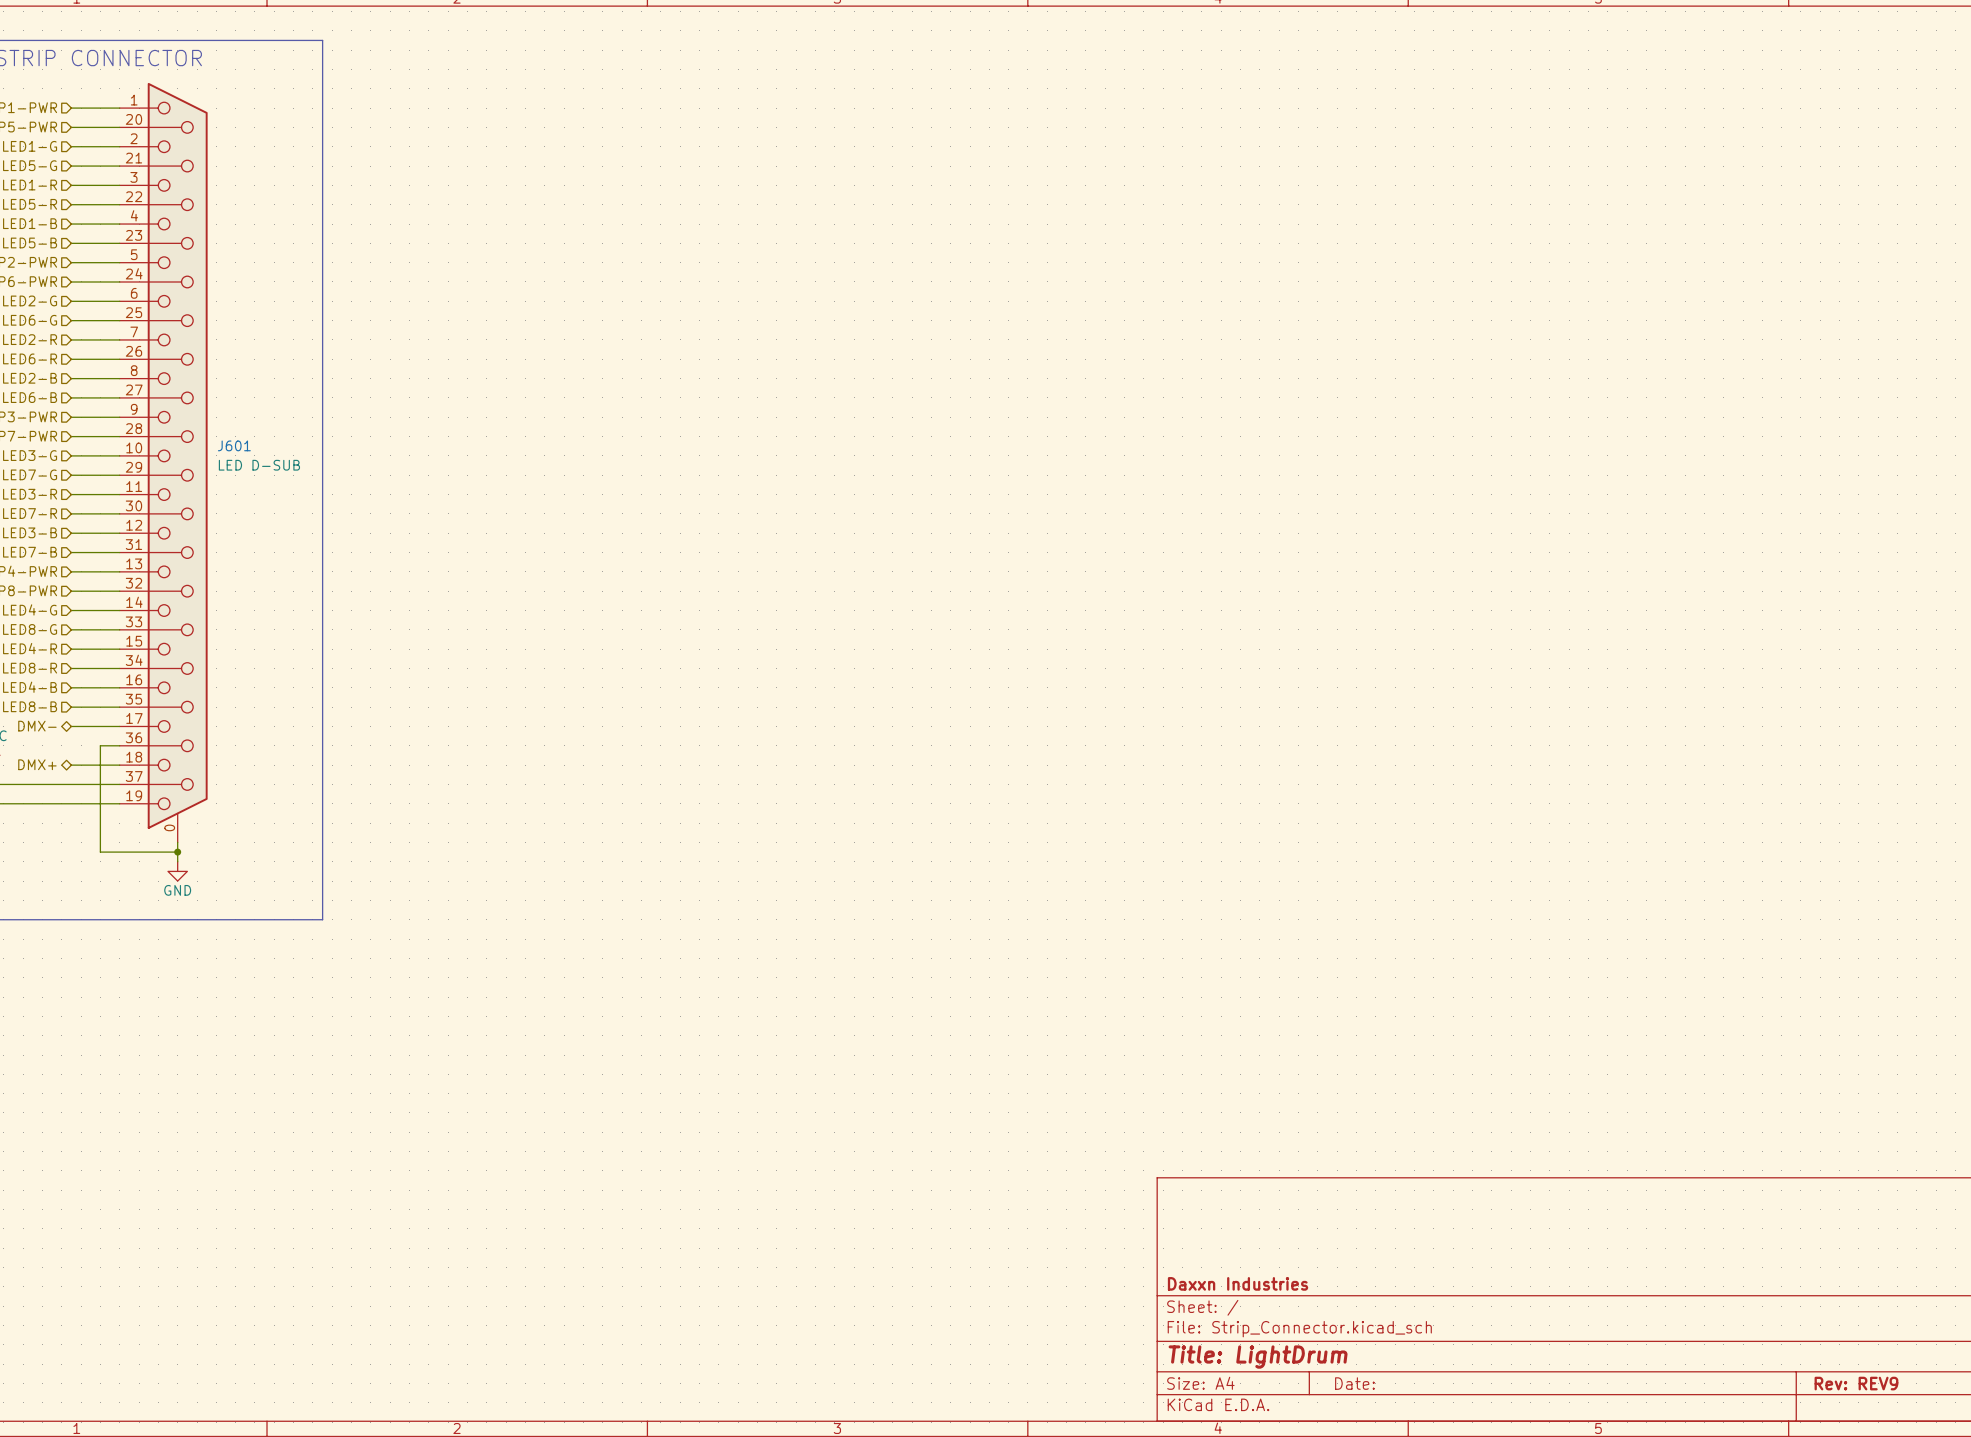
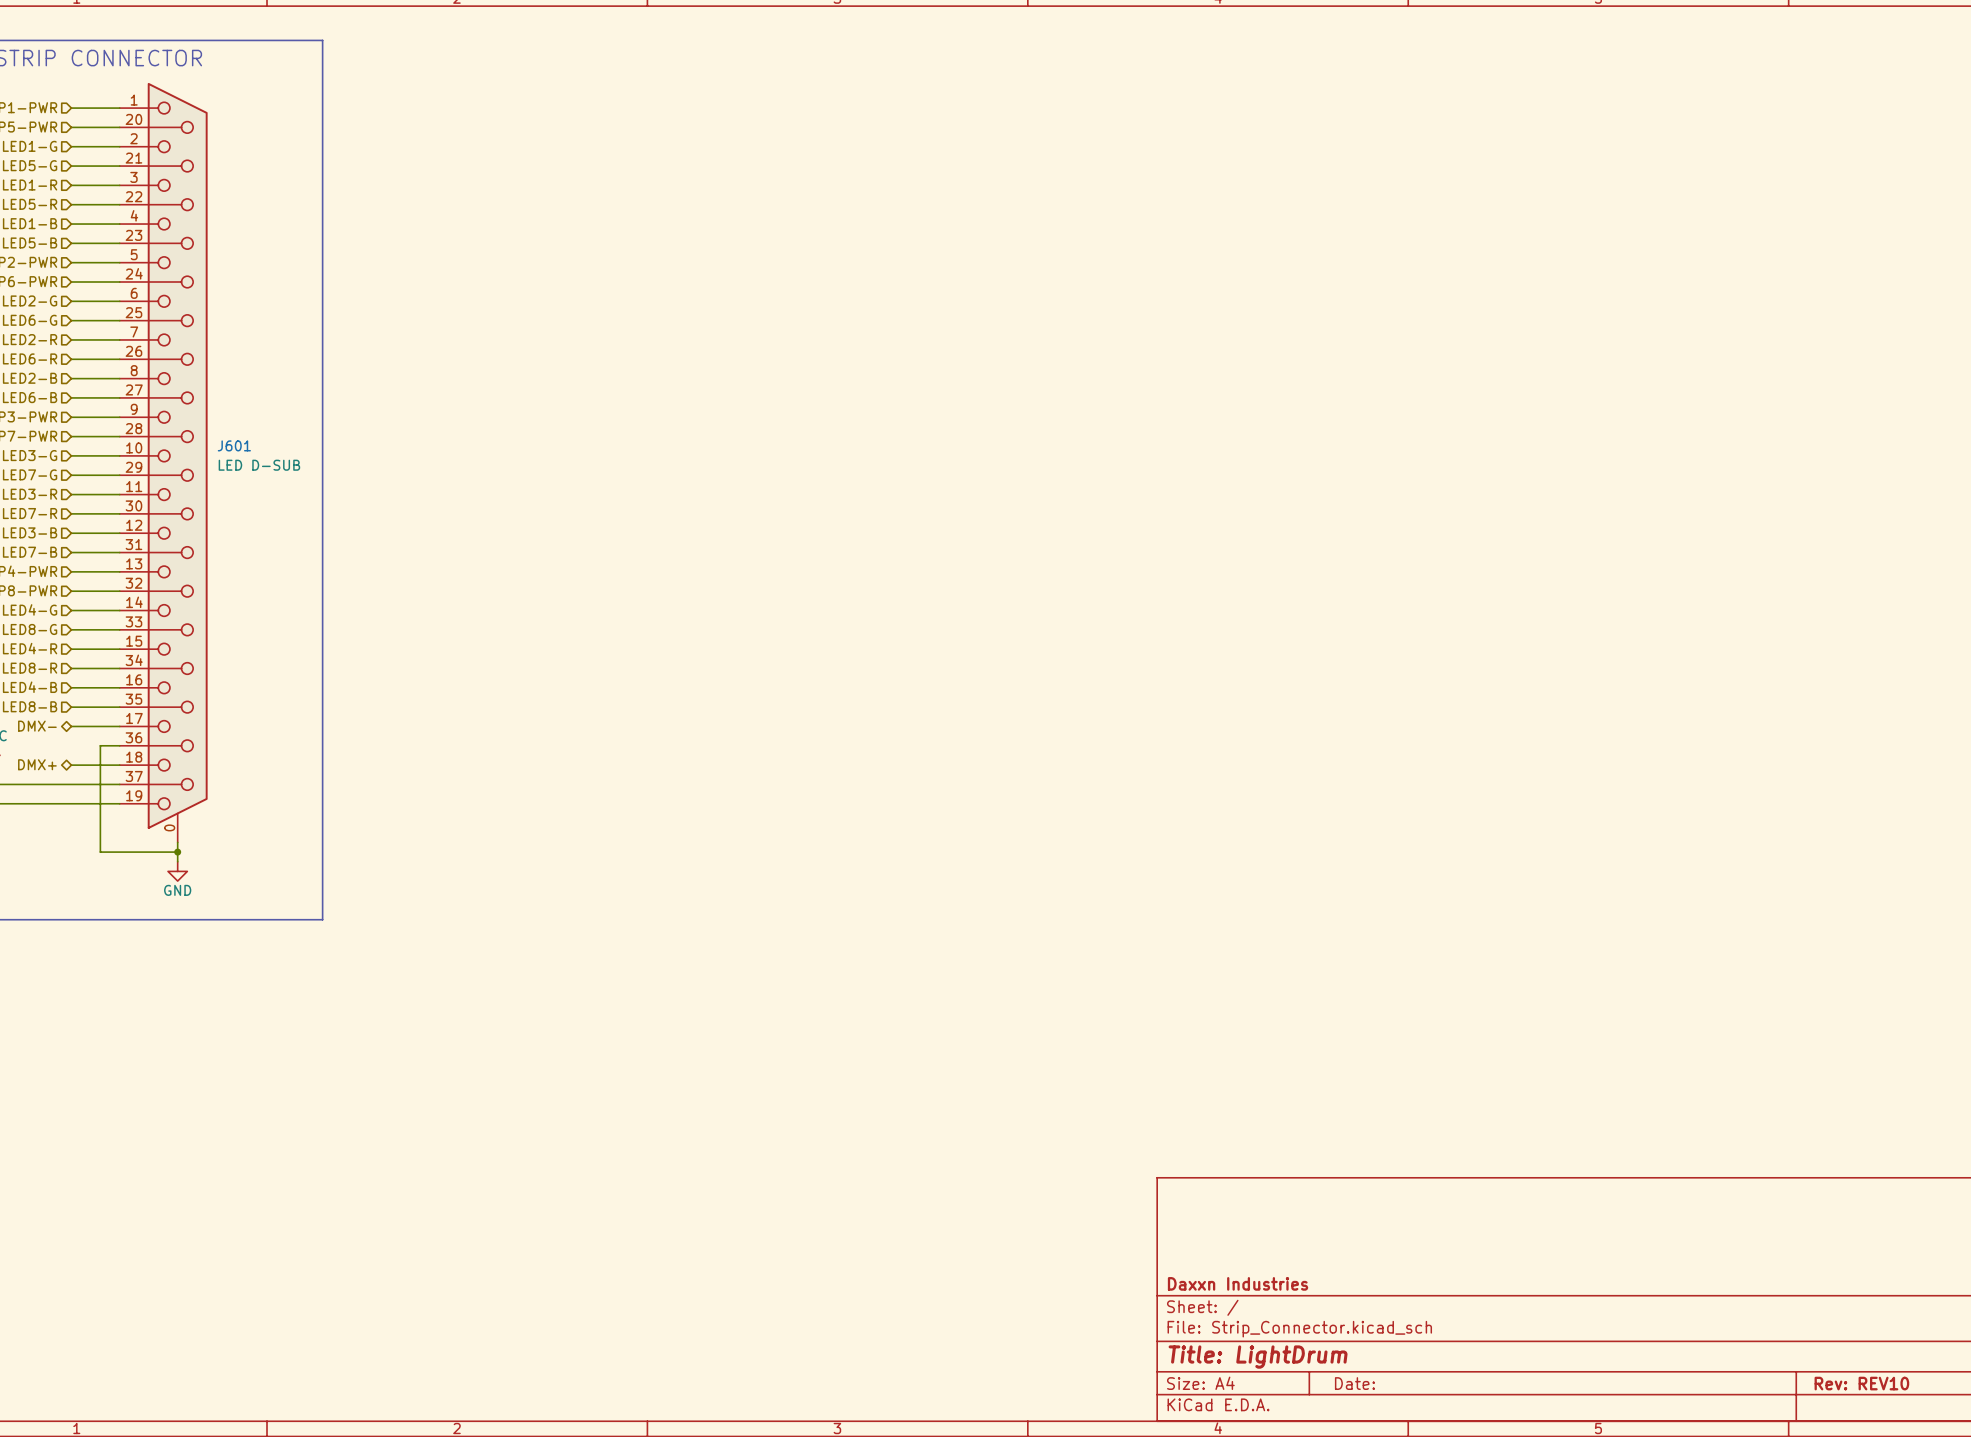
title block: Rev: REV9 (1856, 1383) -> Rev: REV10 (1861, 1383)

